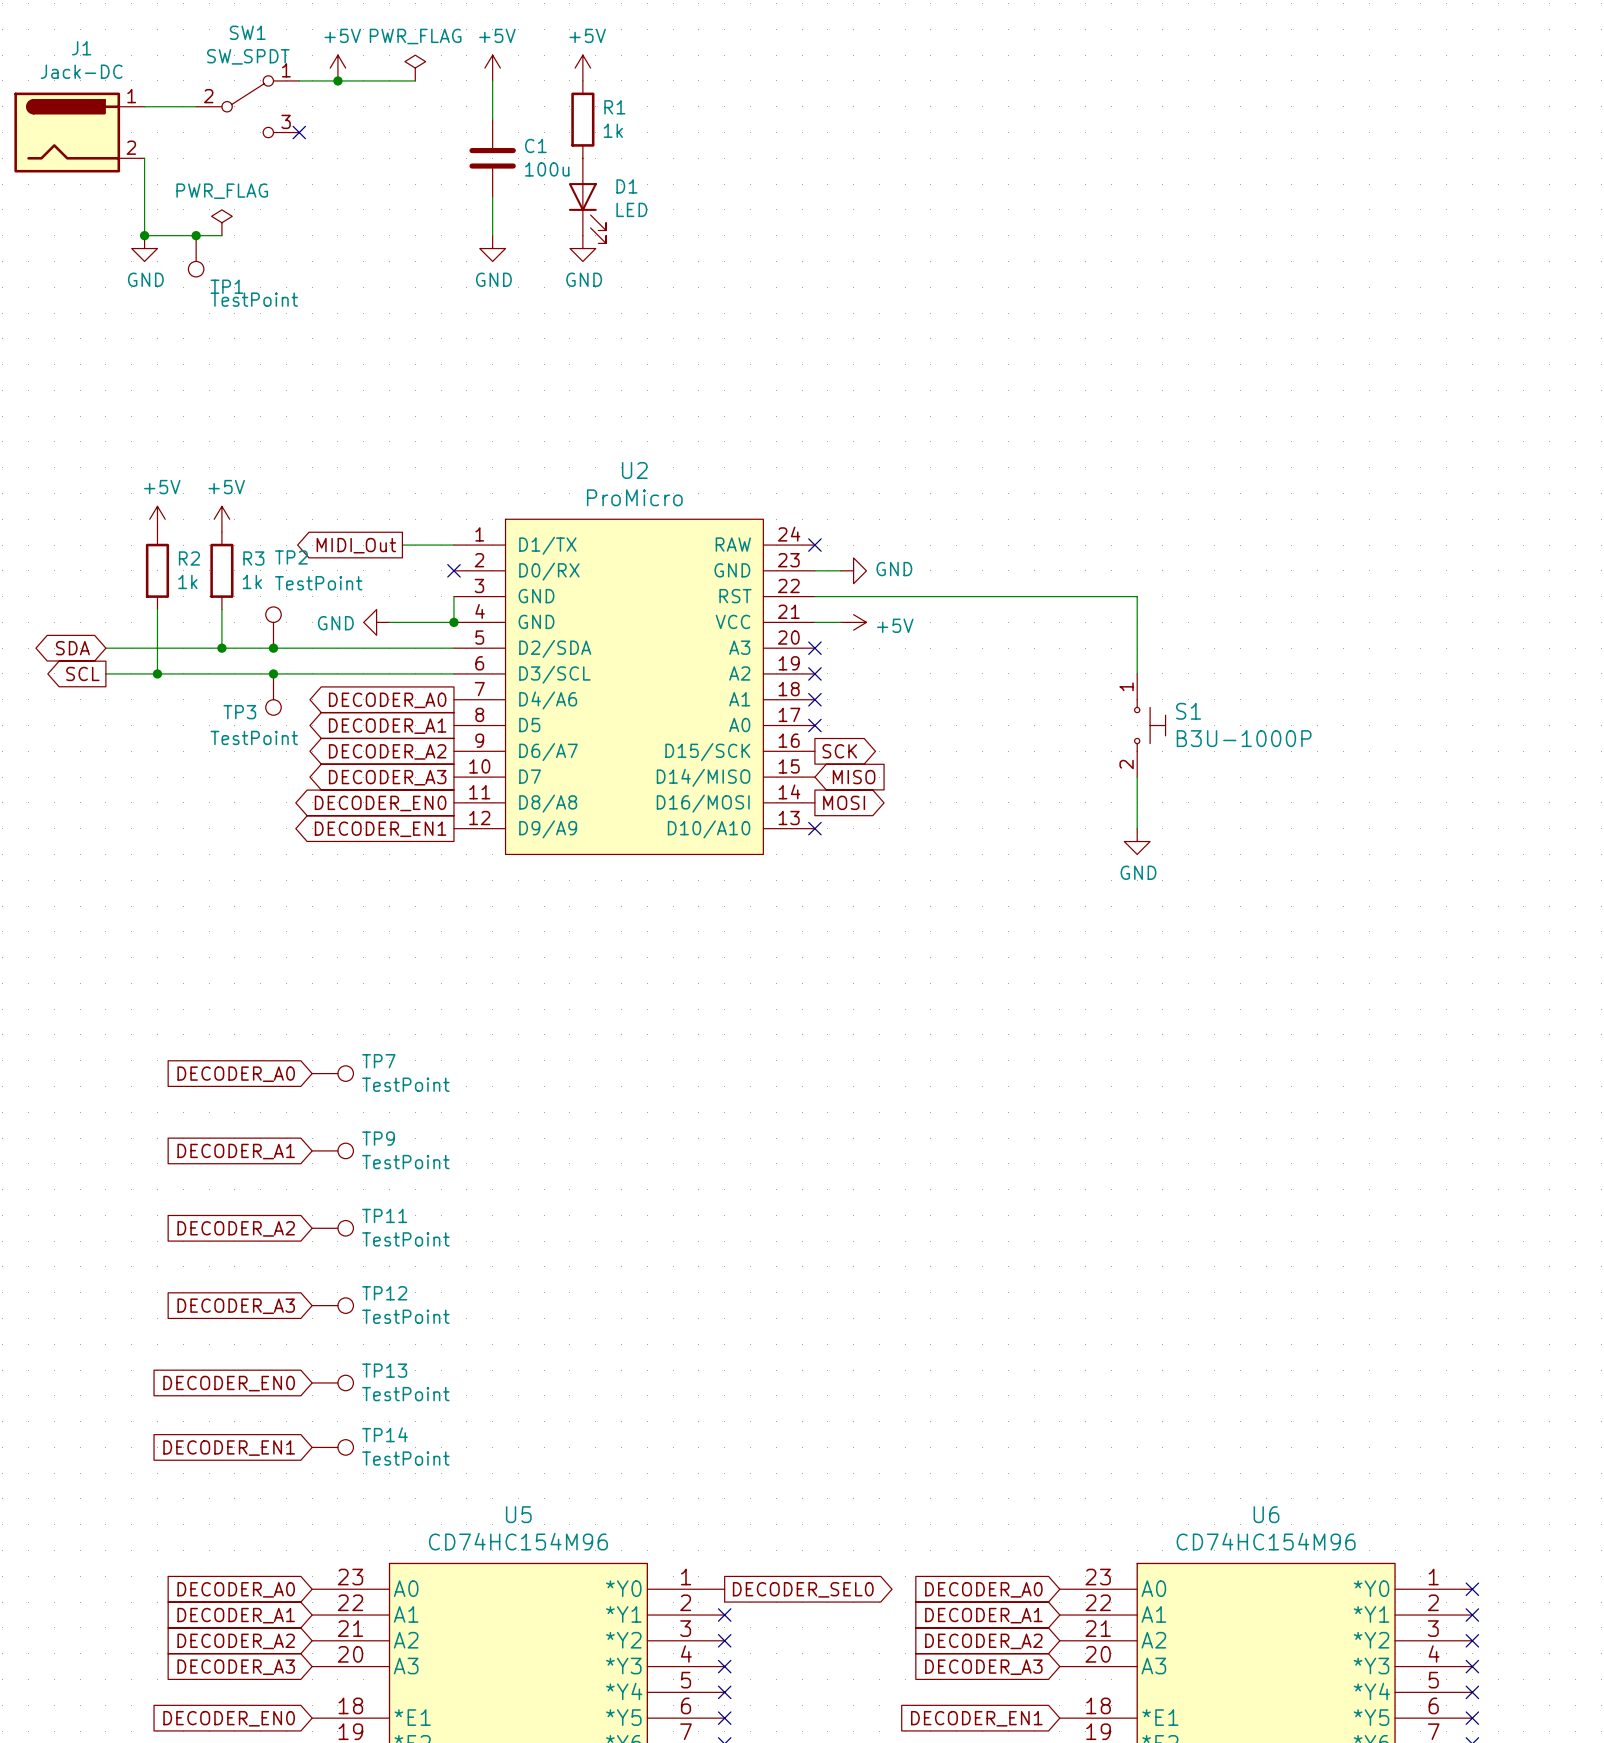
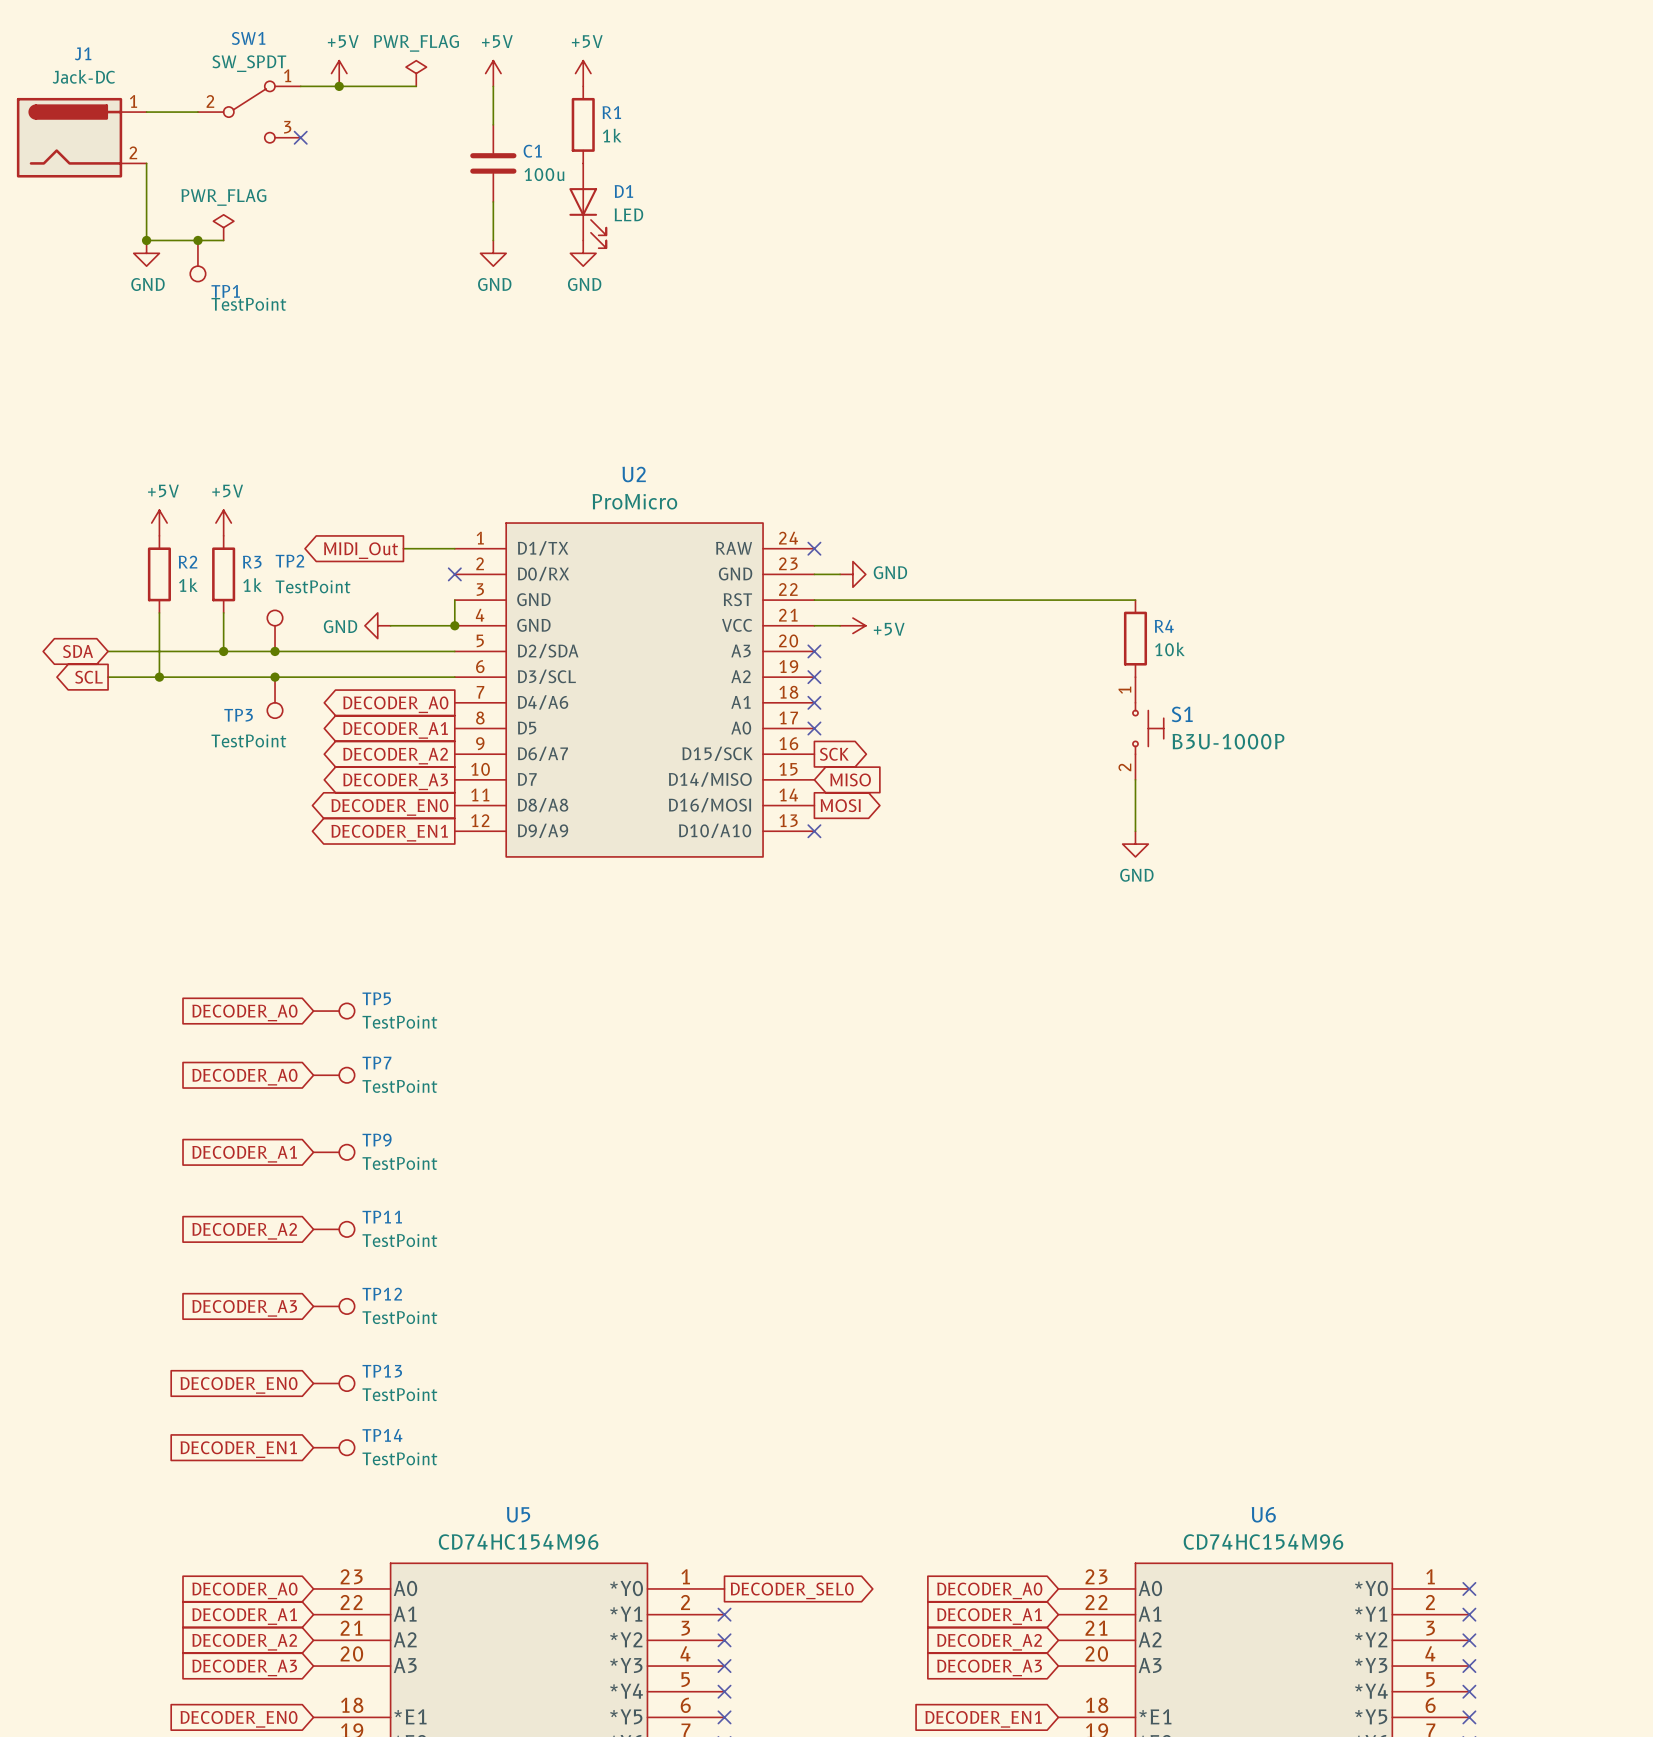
wire: (1137, 596) (1137, 673) -> none
R4: none -> 10k (1135, 638)
global label: none -> DECODER_A0 (244, 1012)
TP5: none -> TestPoint (334, 1011)

